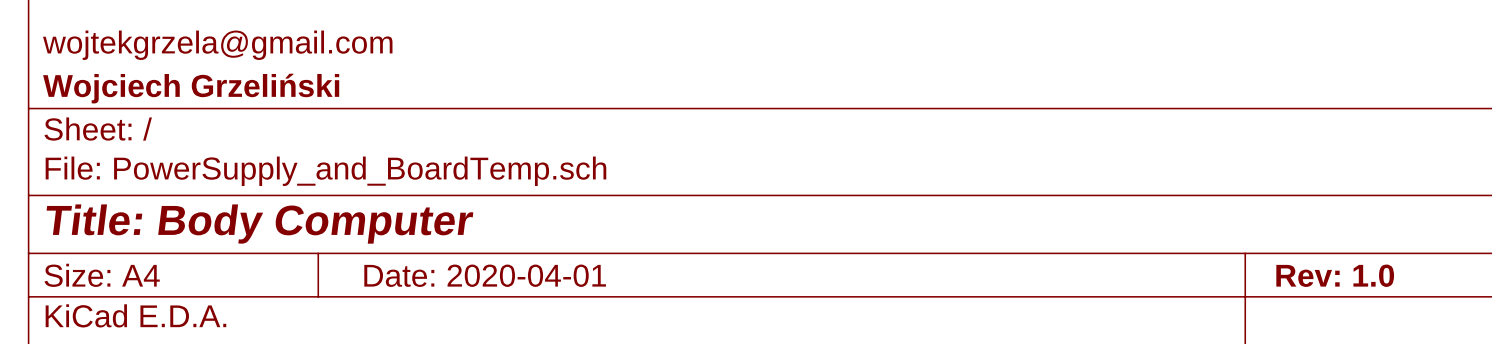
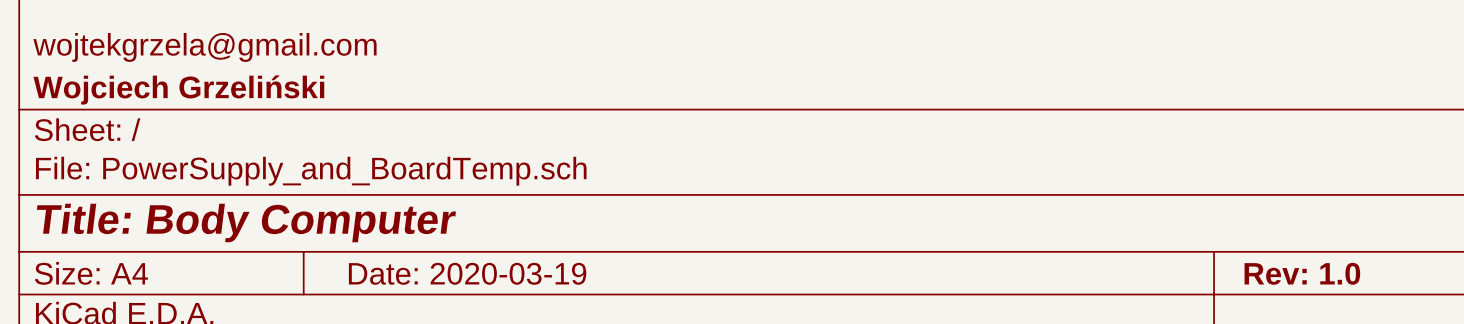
title block: Date: 2020-04-01 (485, 275) -> Date: 2020-03-19 (467, 273)

